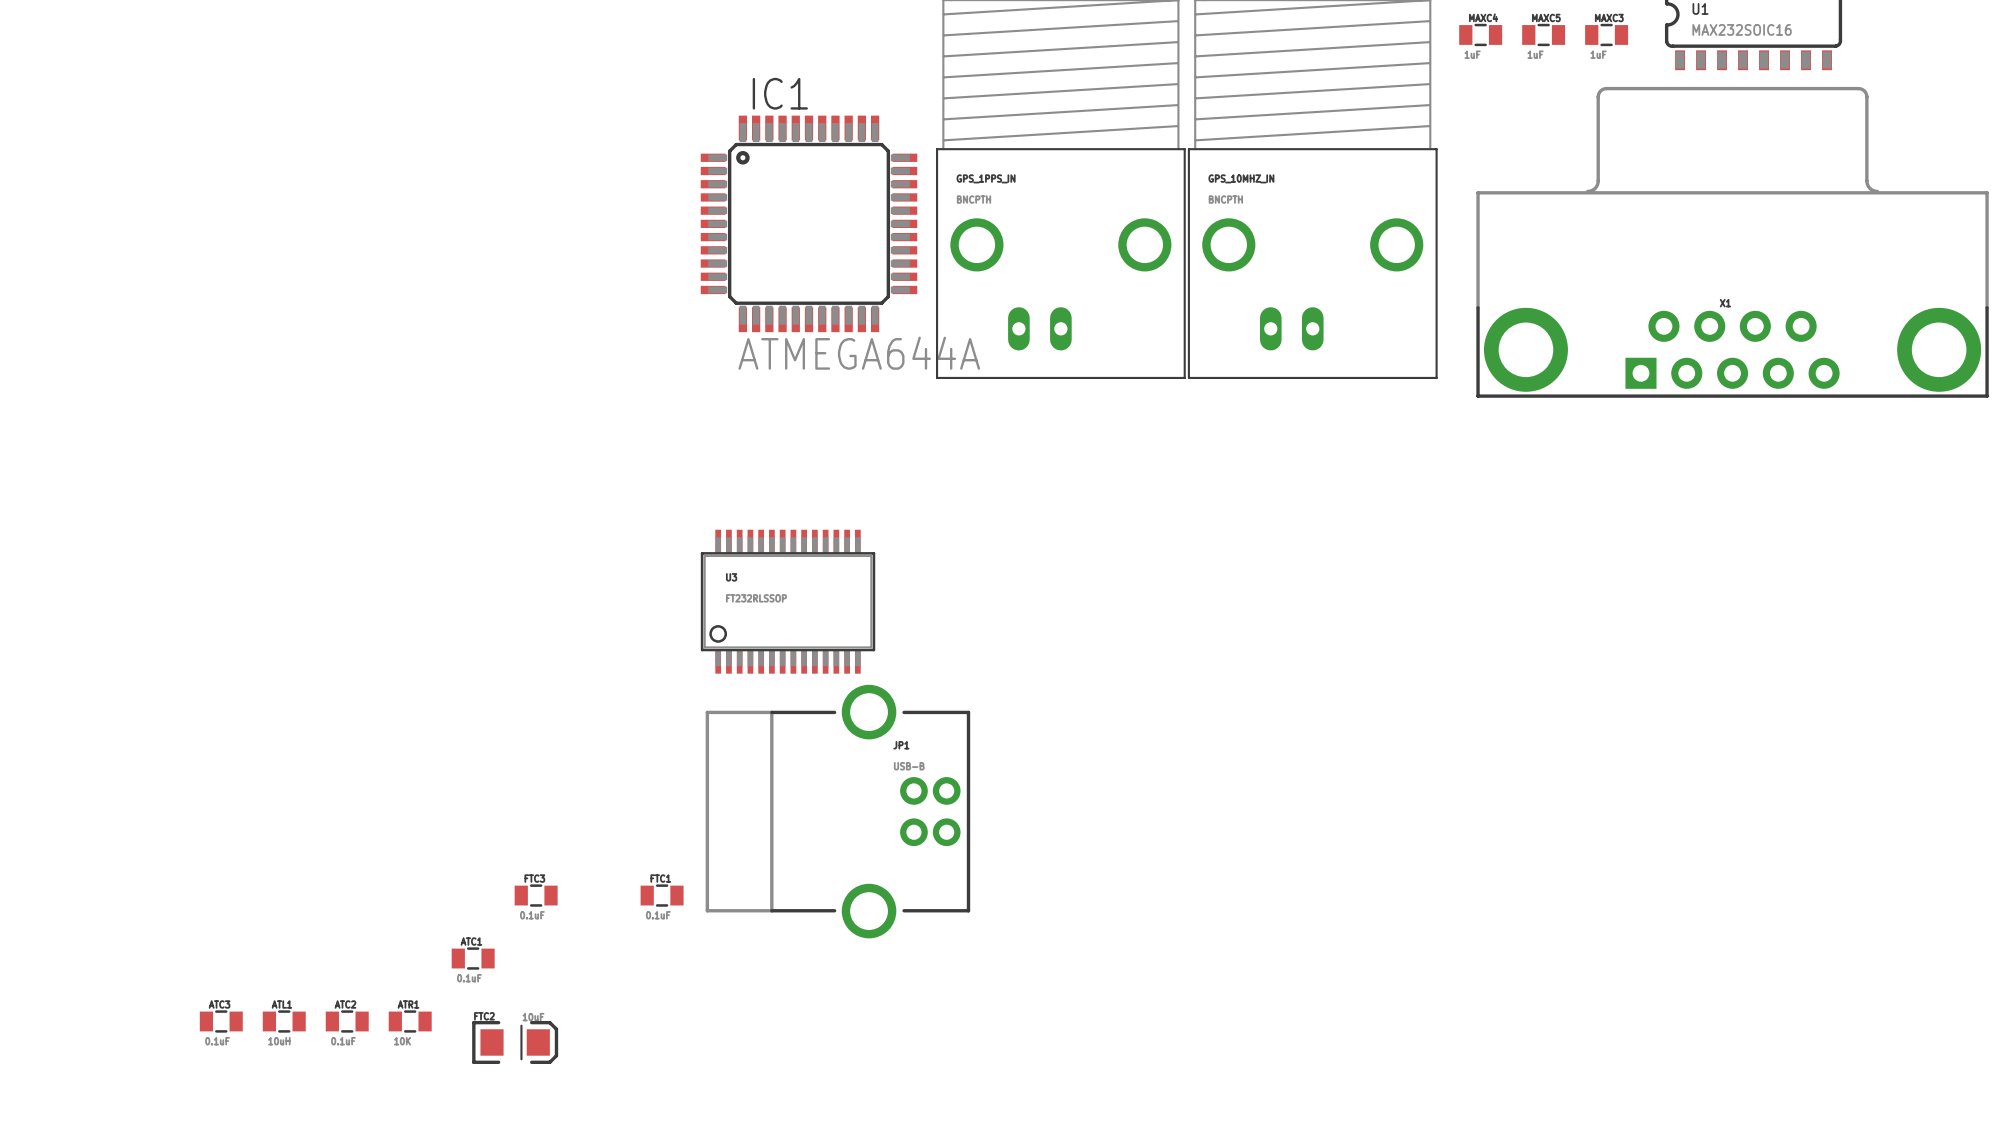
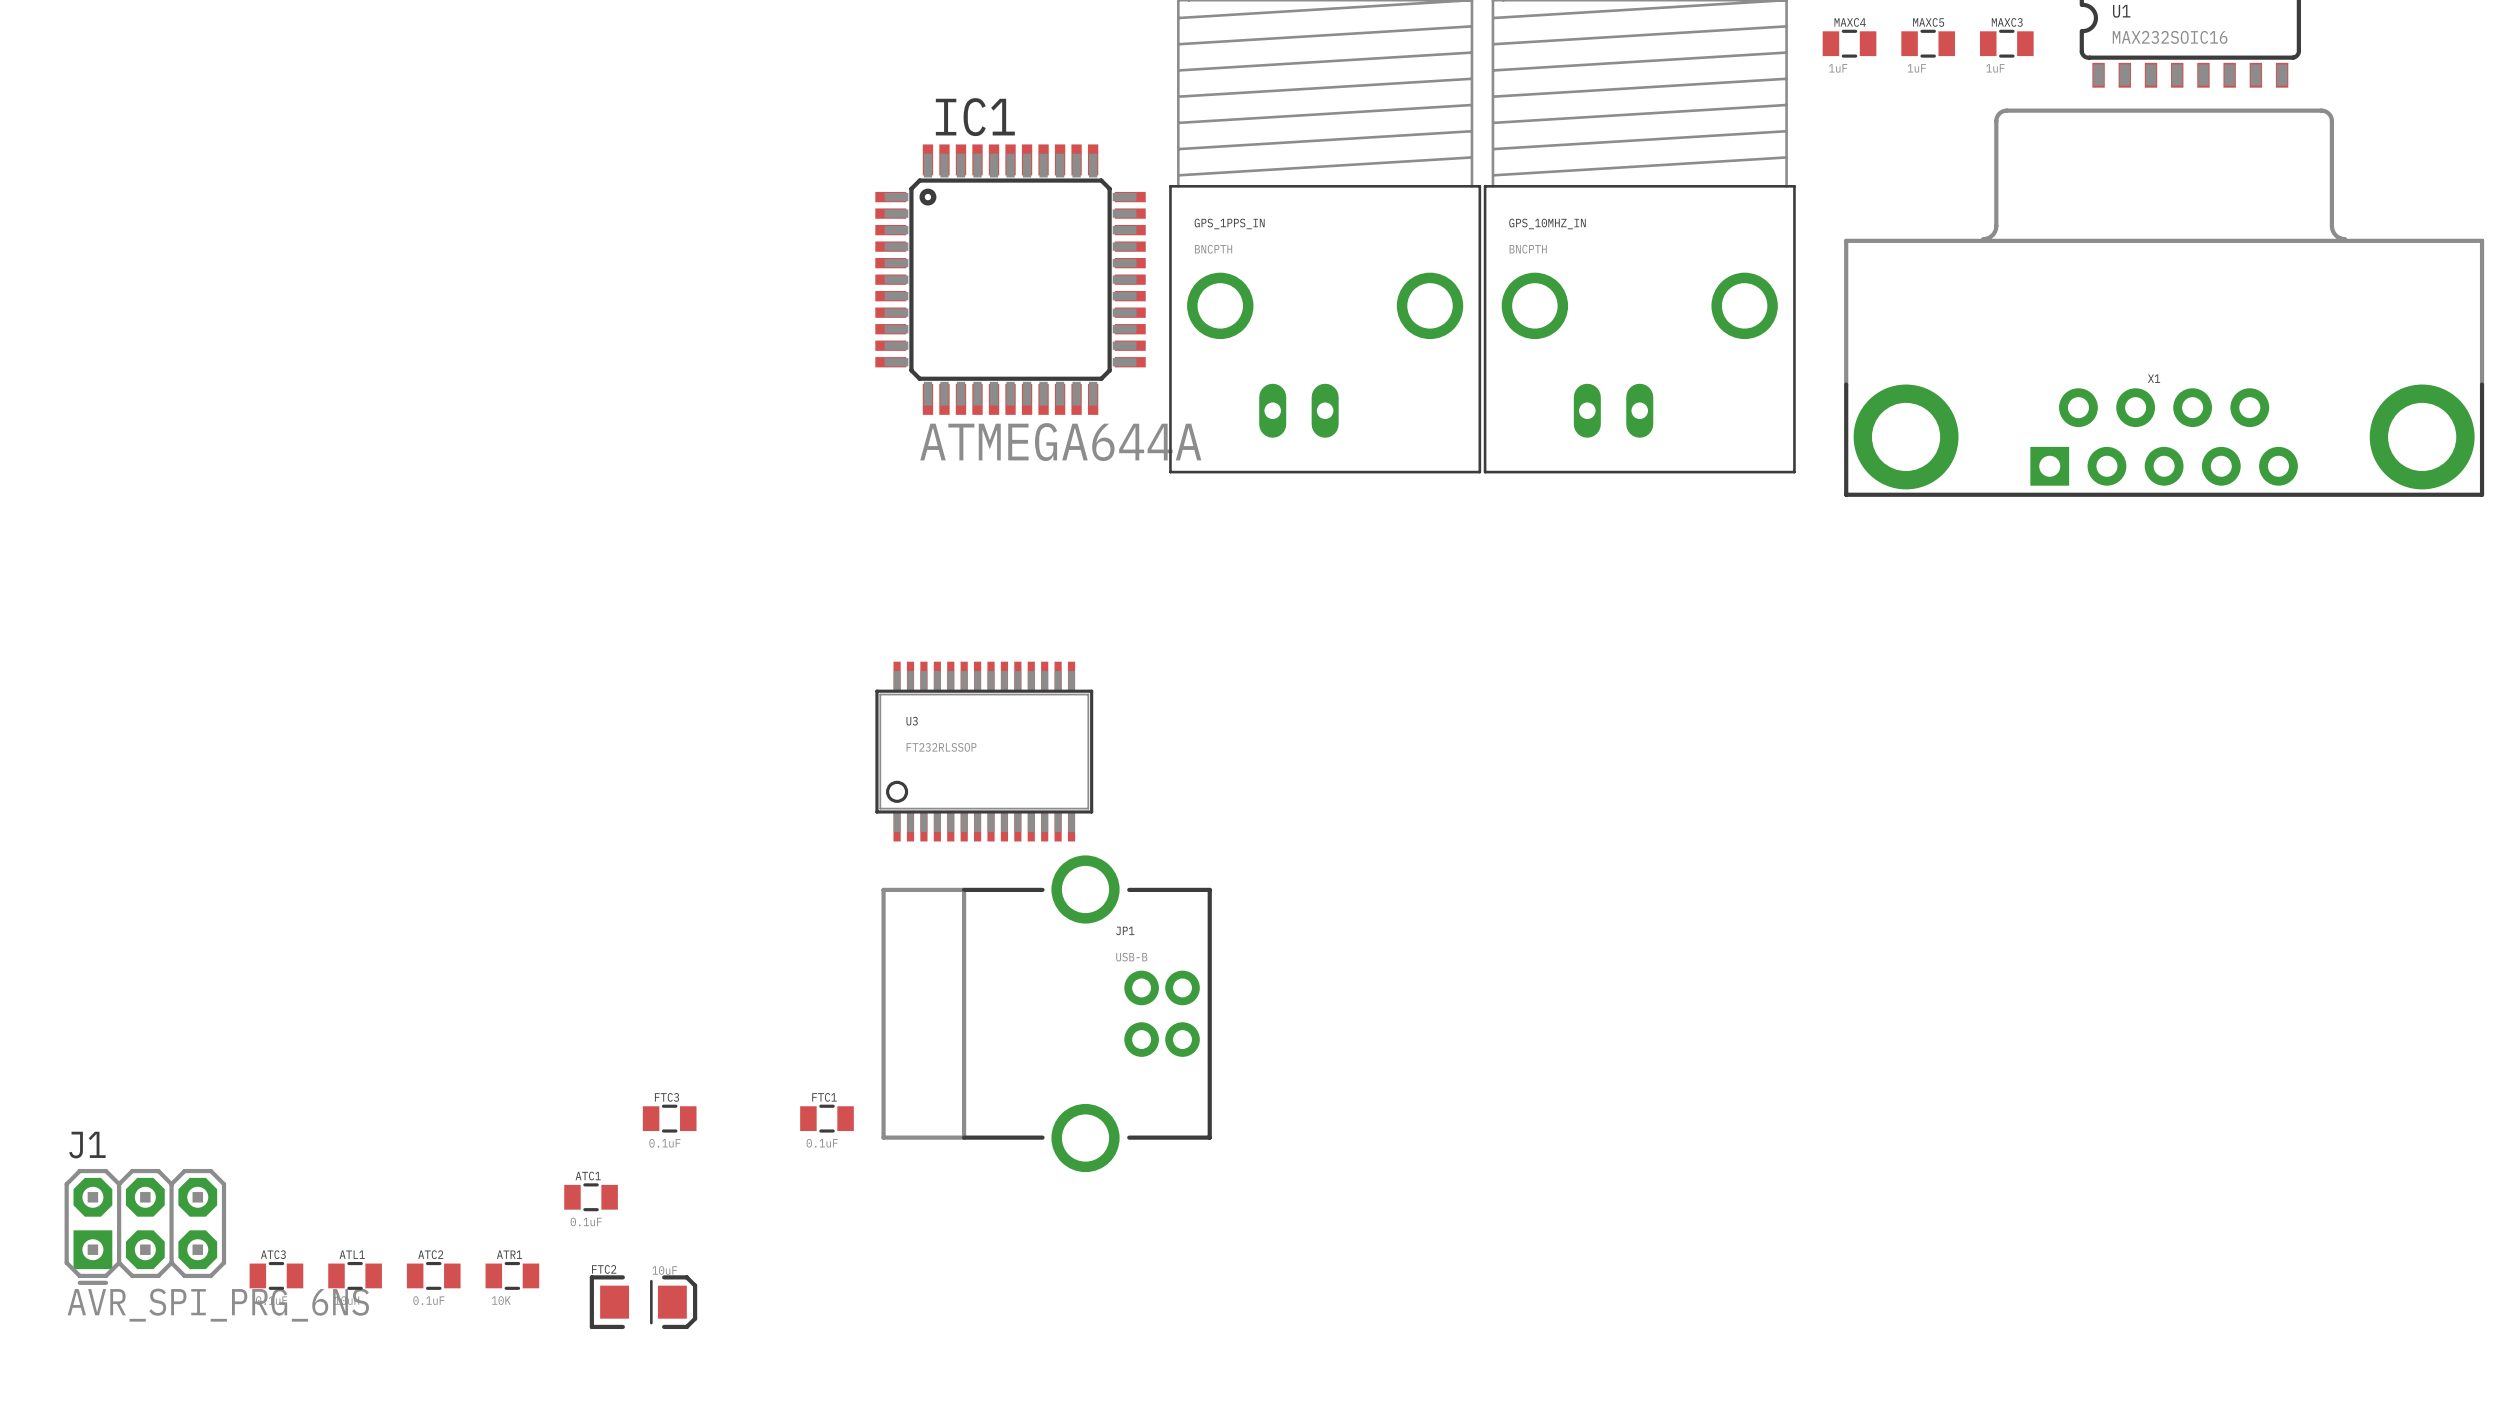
J1: none -> AVR_SPI_PRG_6NS (145, 1226)

